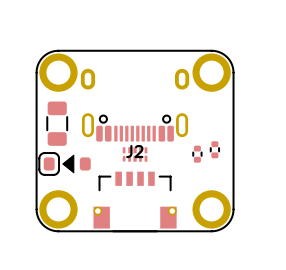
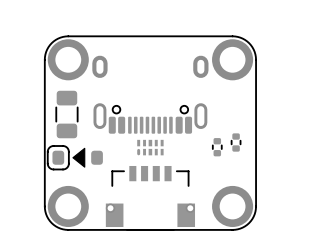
J2 name: J2 (134, 151) -> none

